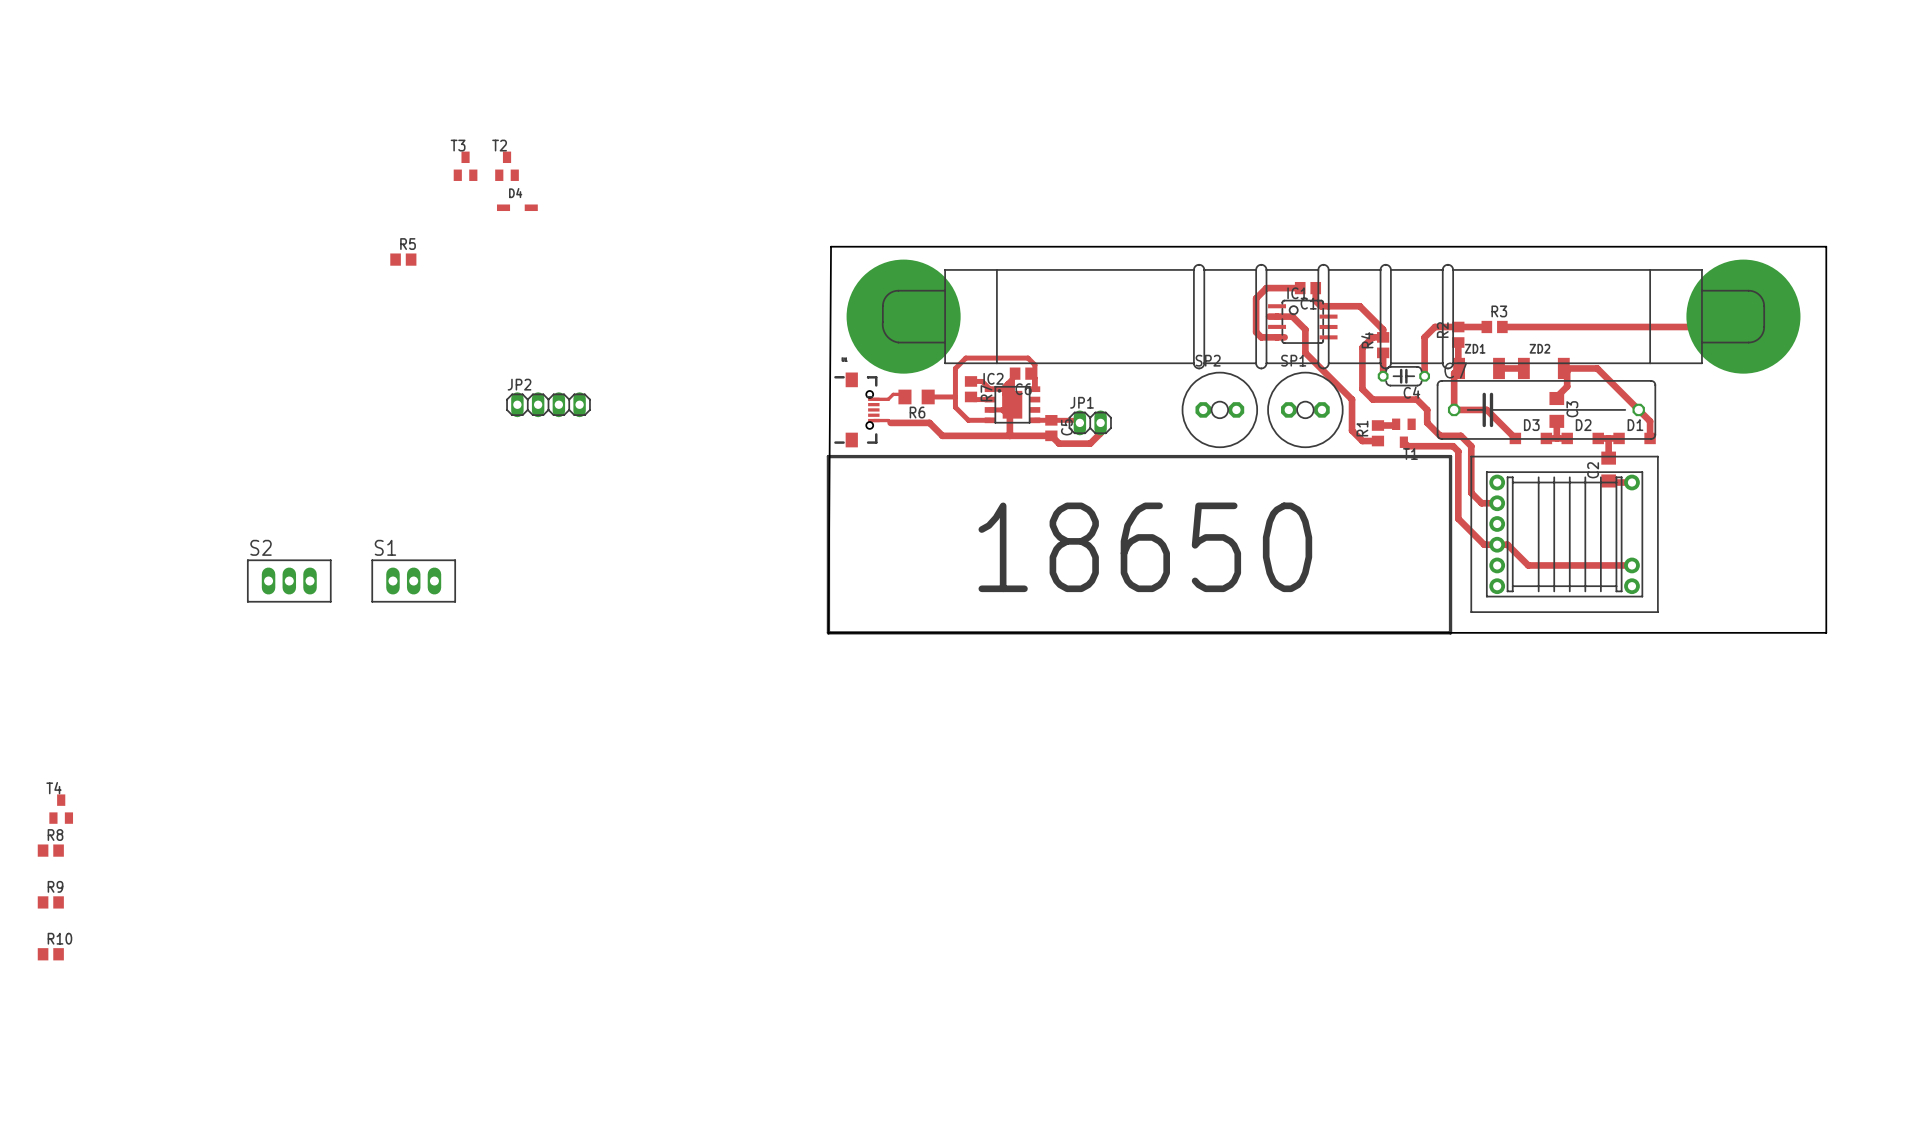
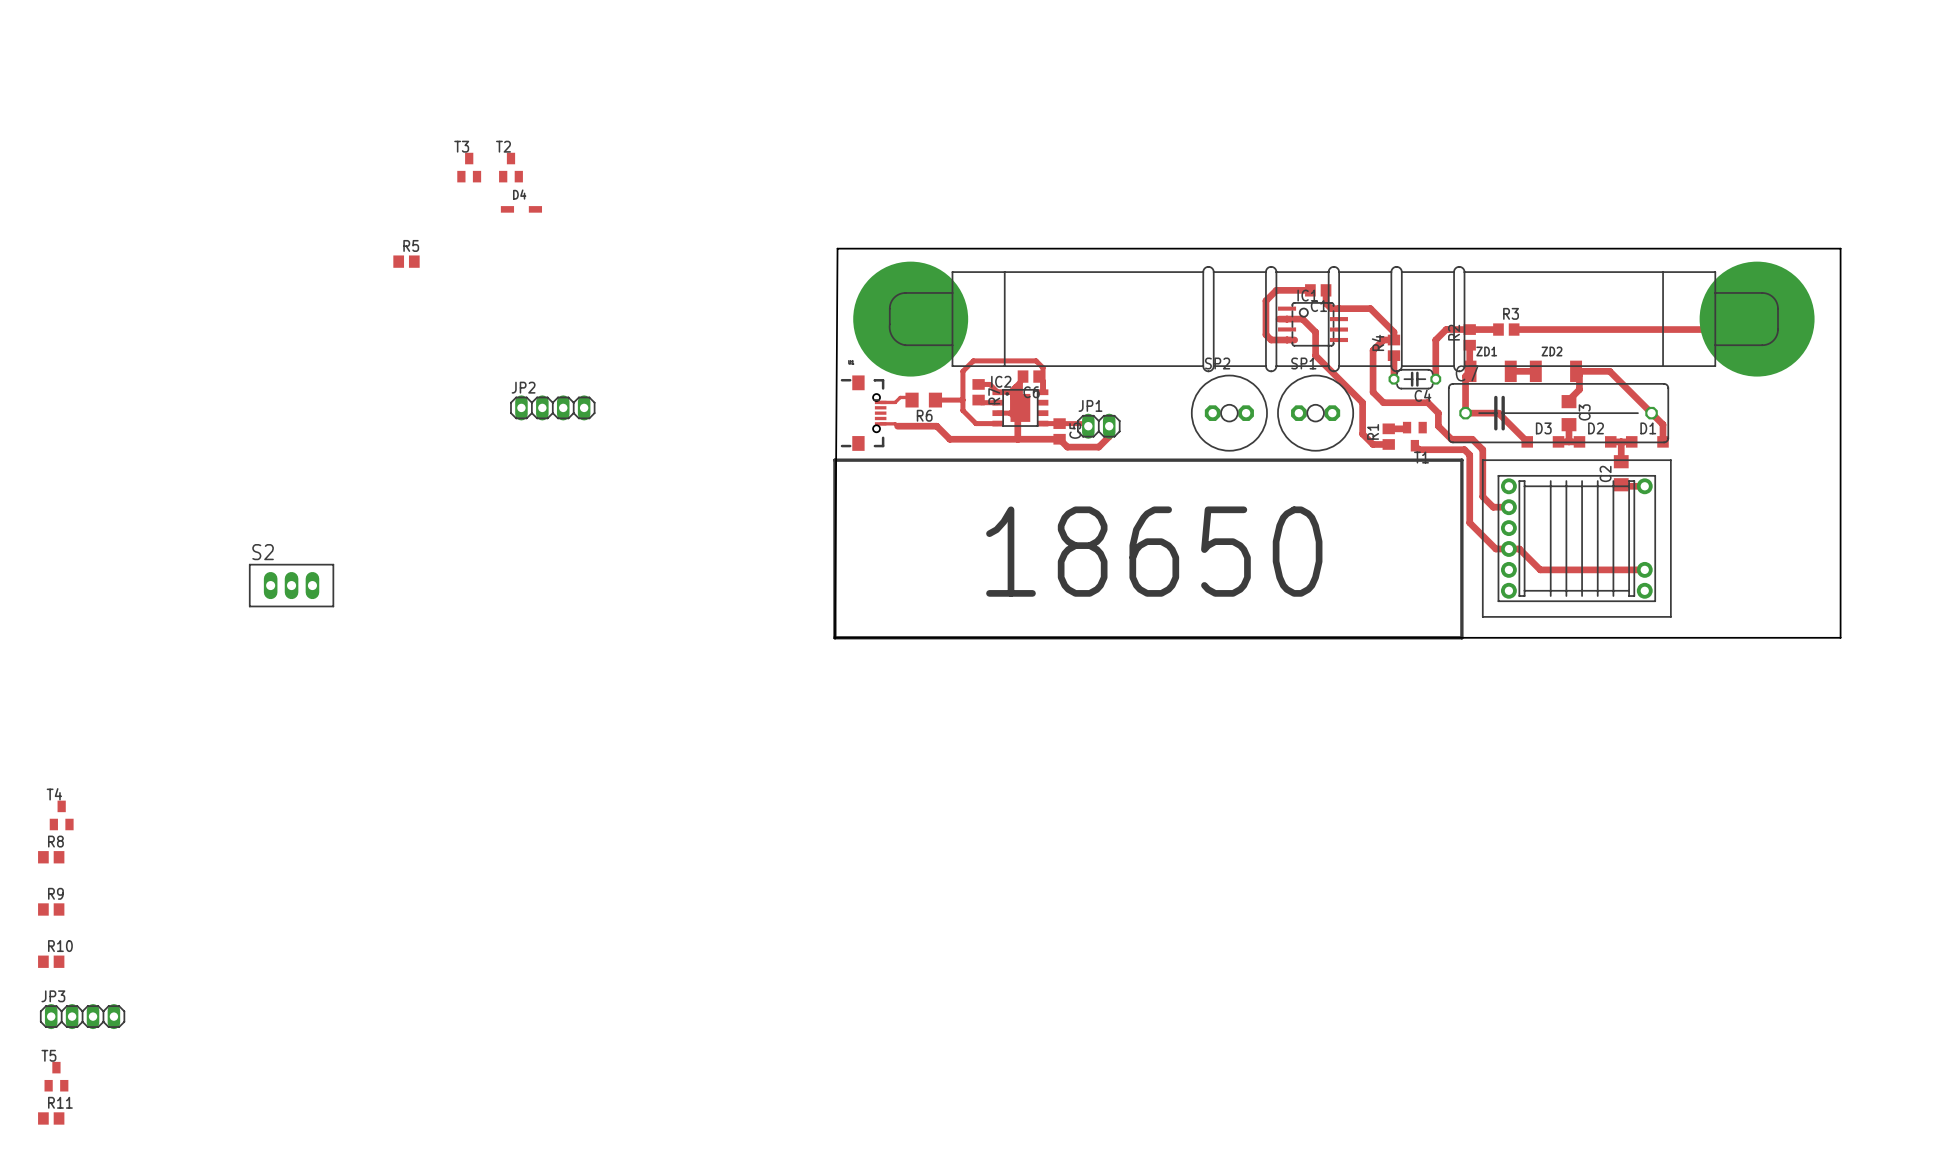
S1: (413, 581) -> none
JP3: none -> (82, 1016)
T5: none -> (56, 1076)
R11: none -> (51, 1118)

